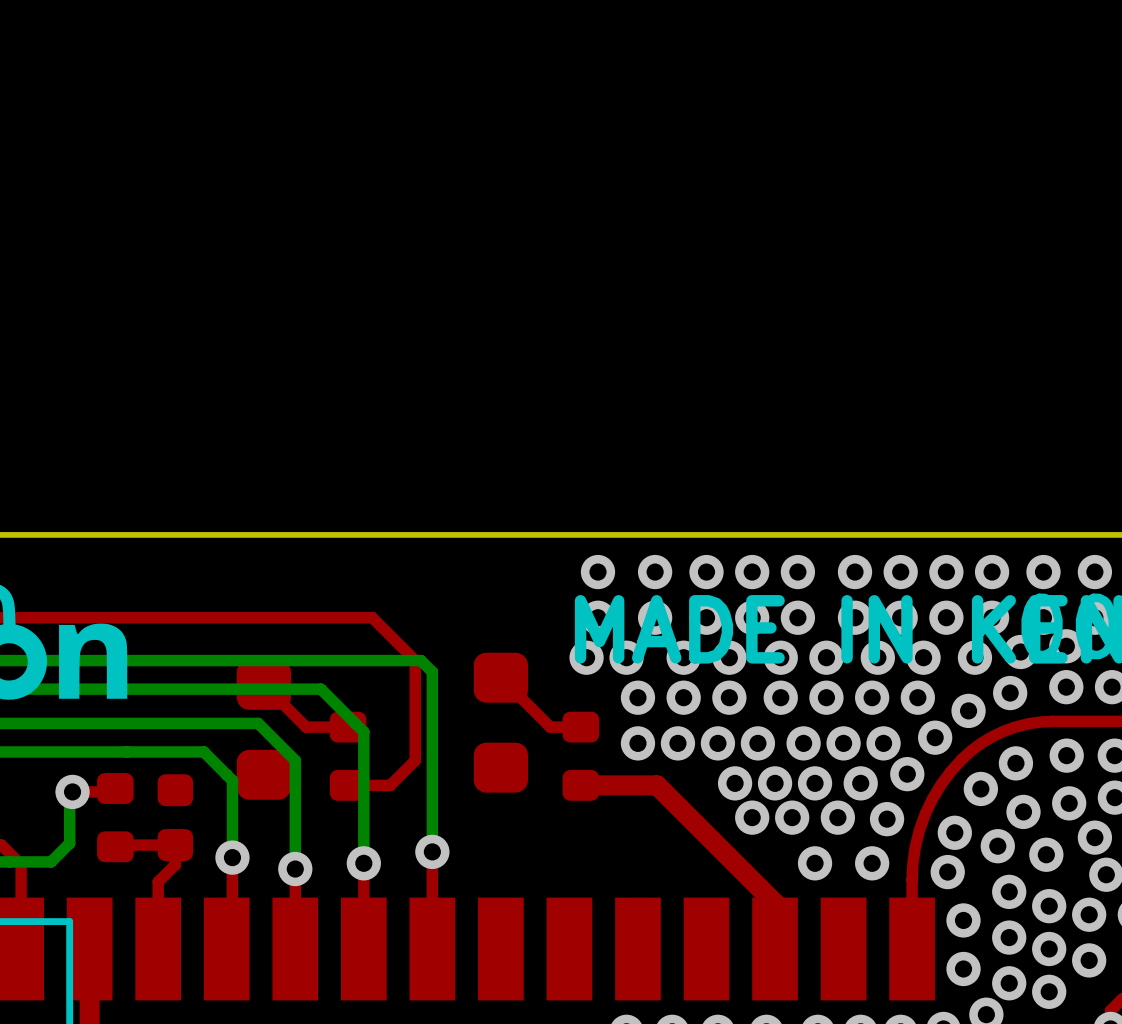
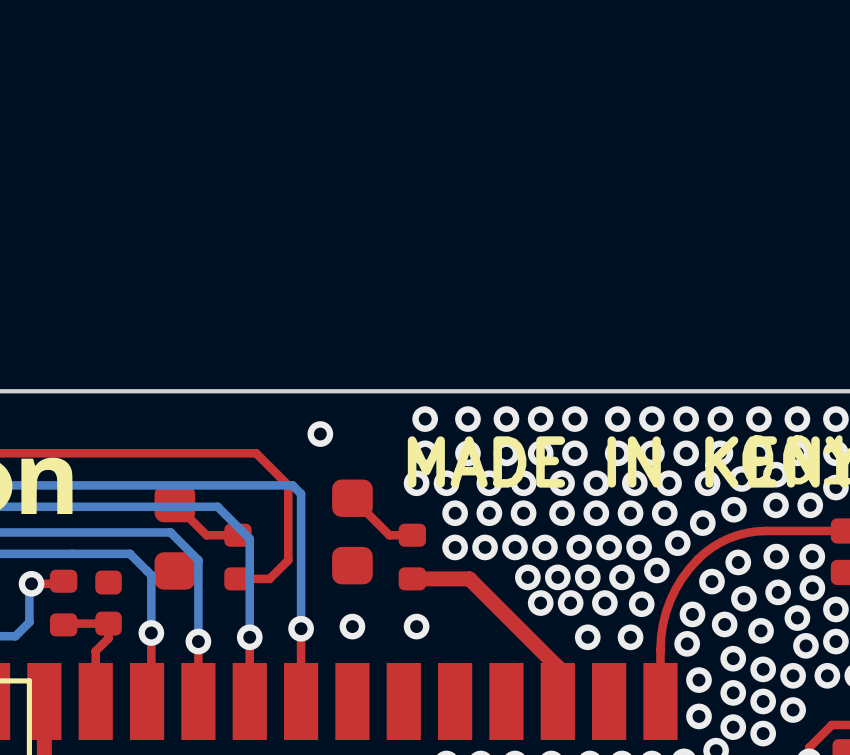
via: none -> (320, 434)
via: none -> (352, 626)
via: none -> (416, 626)

